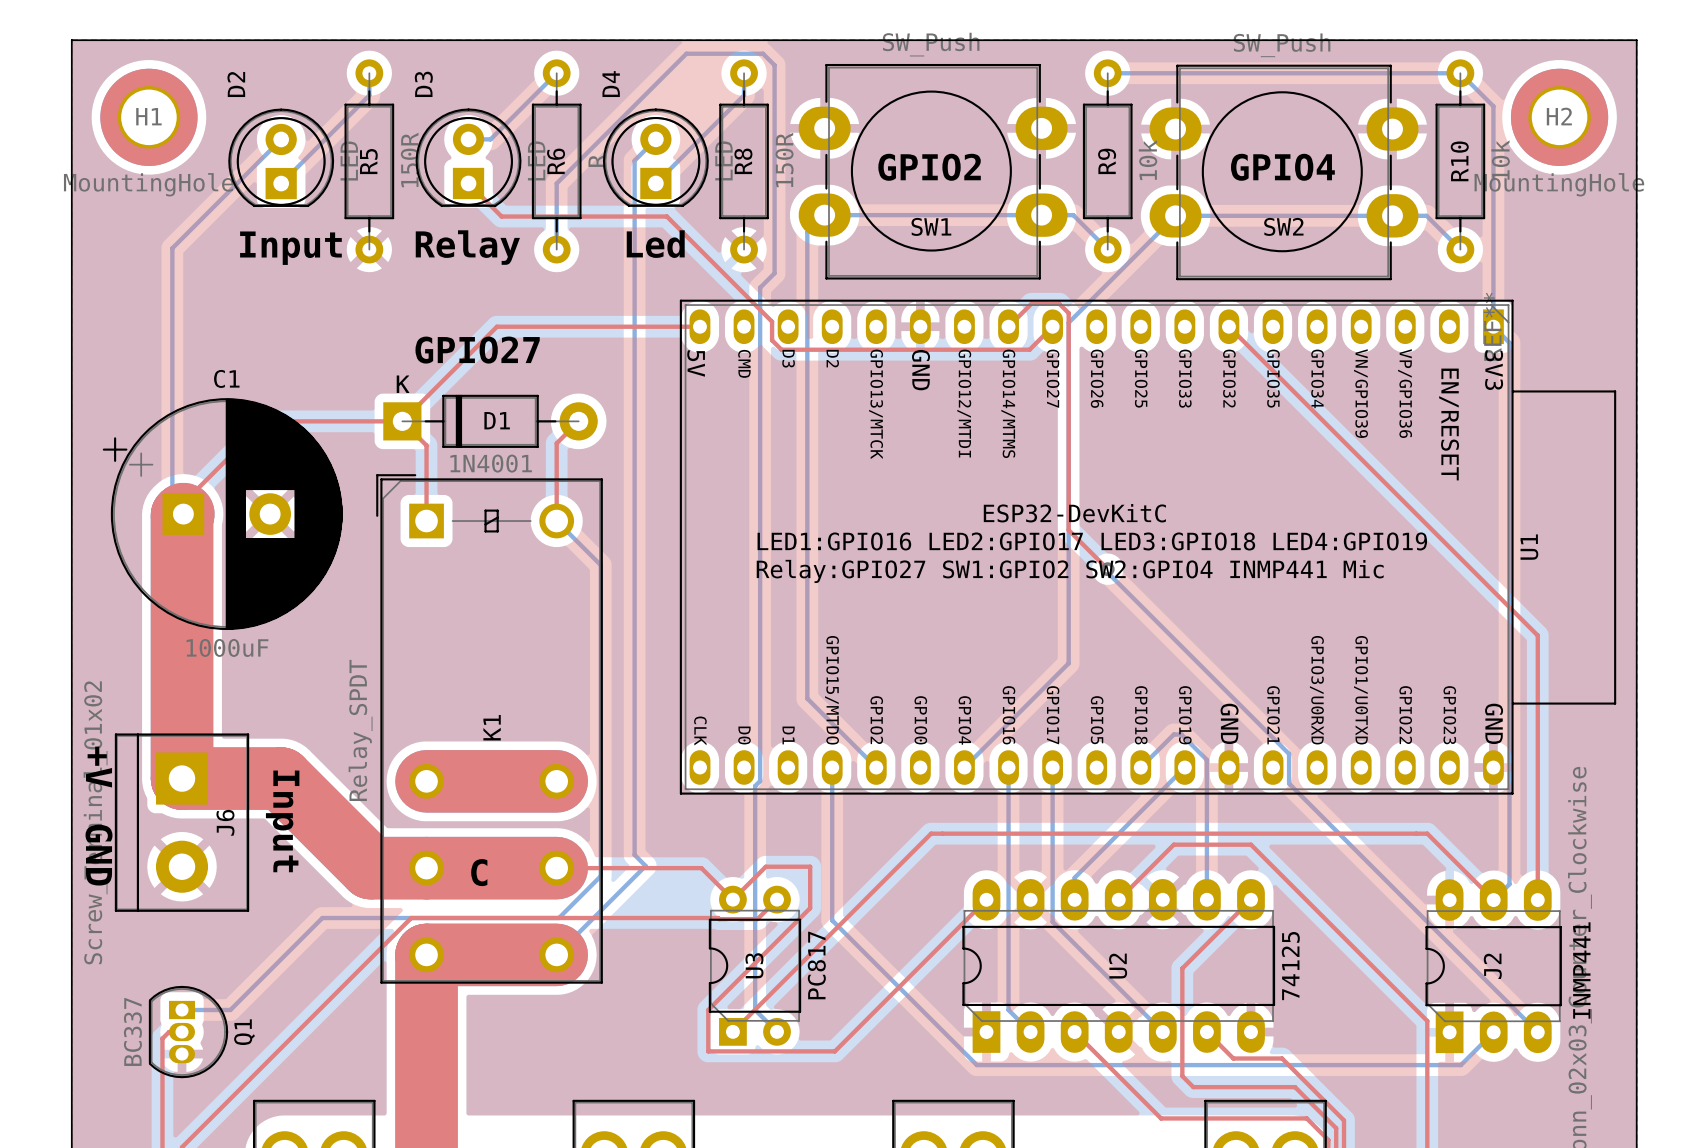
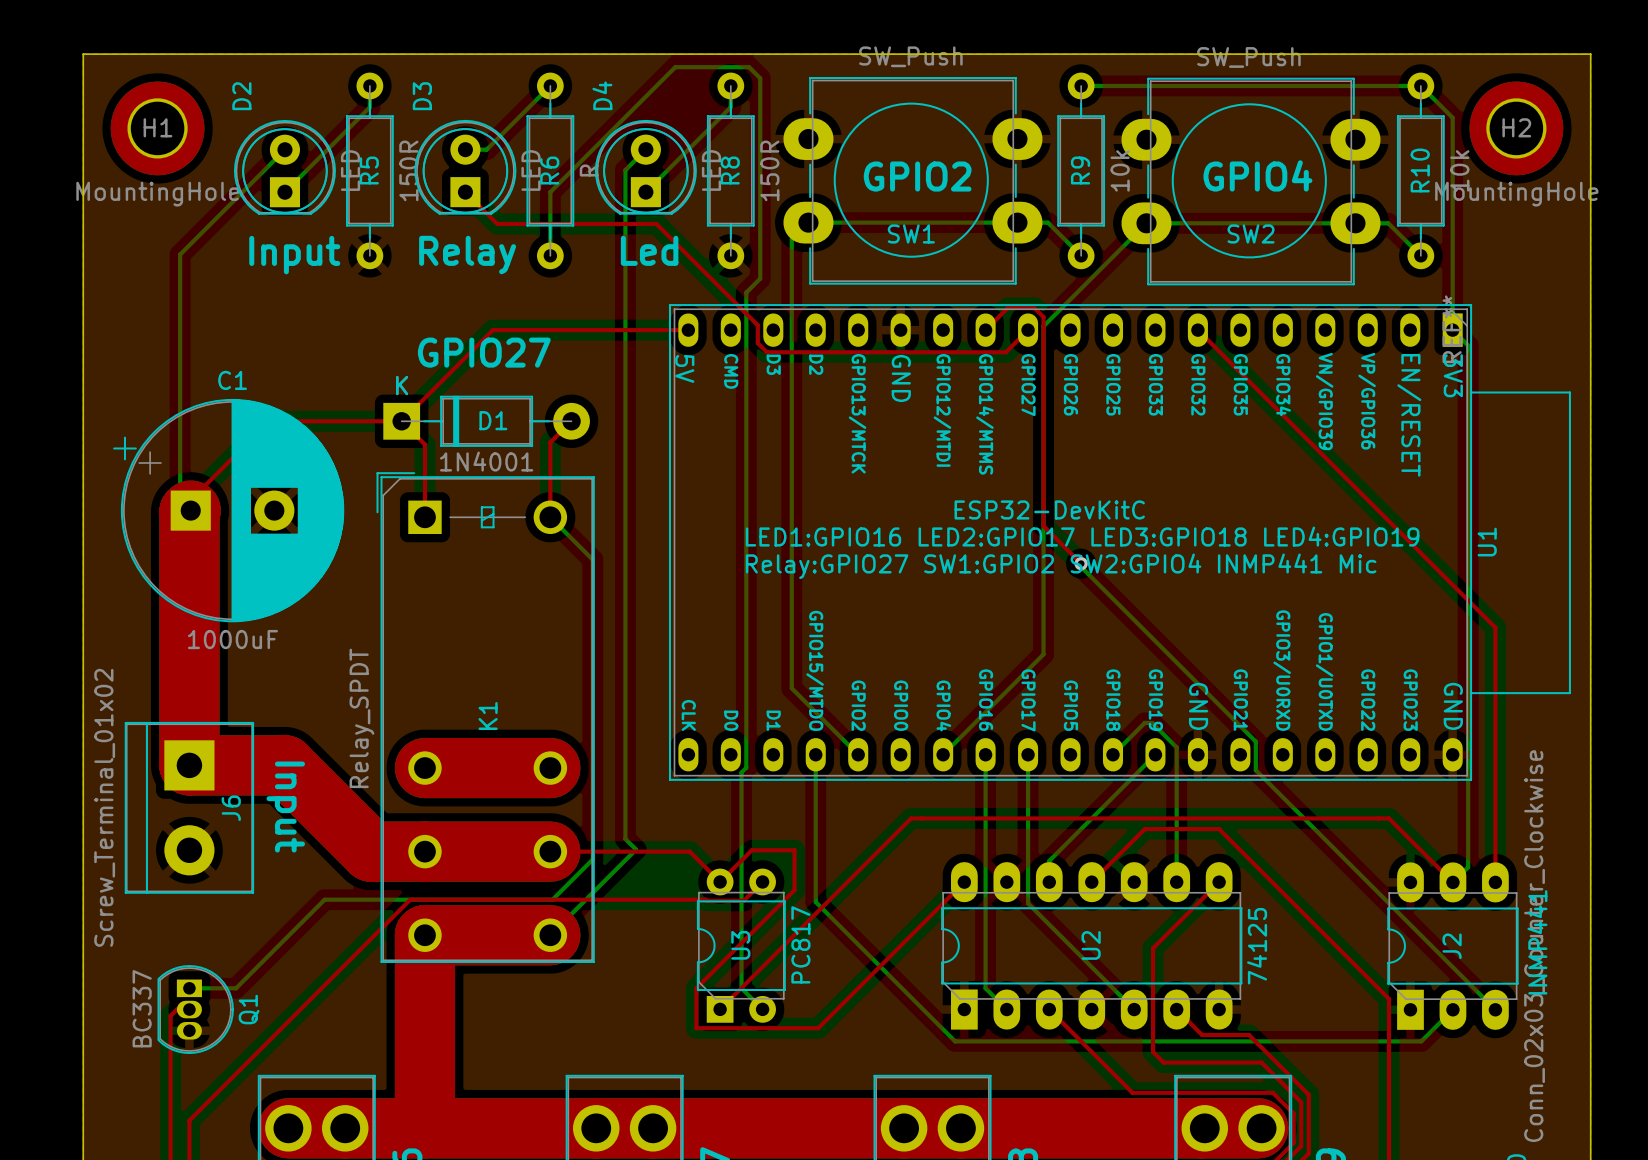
text: +V (99, 767) -> none
text: GND (99, 855) -> none
text: C (479, 872) -> none

